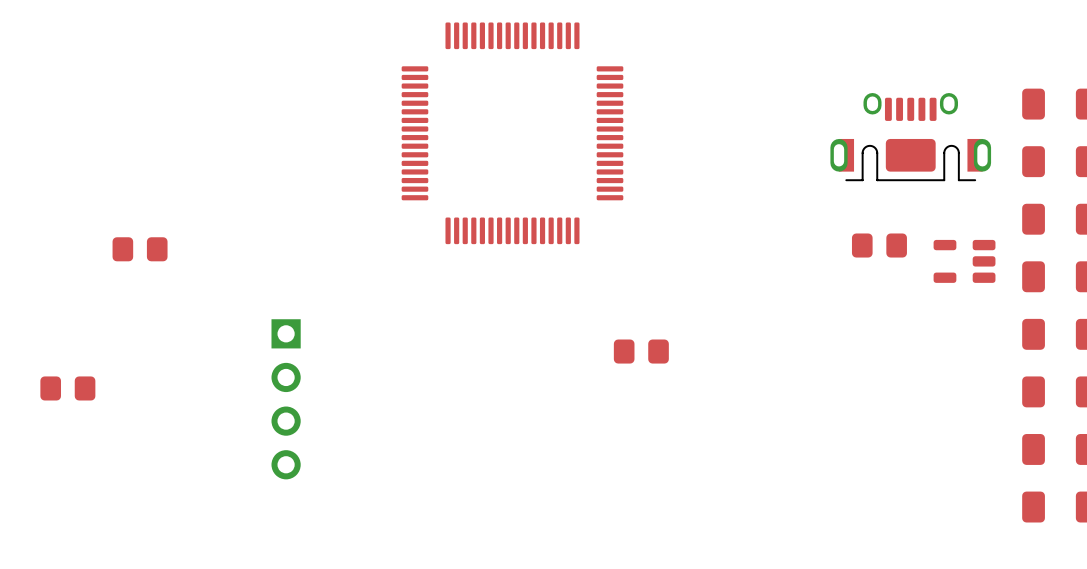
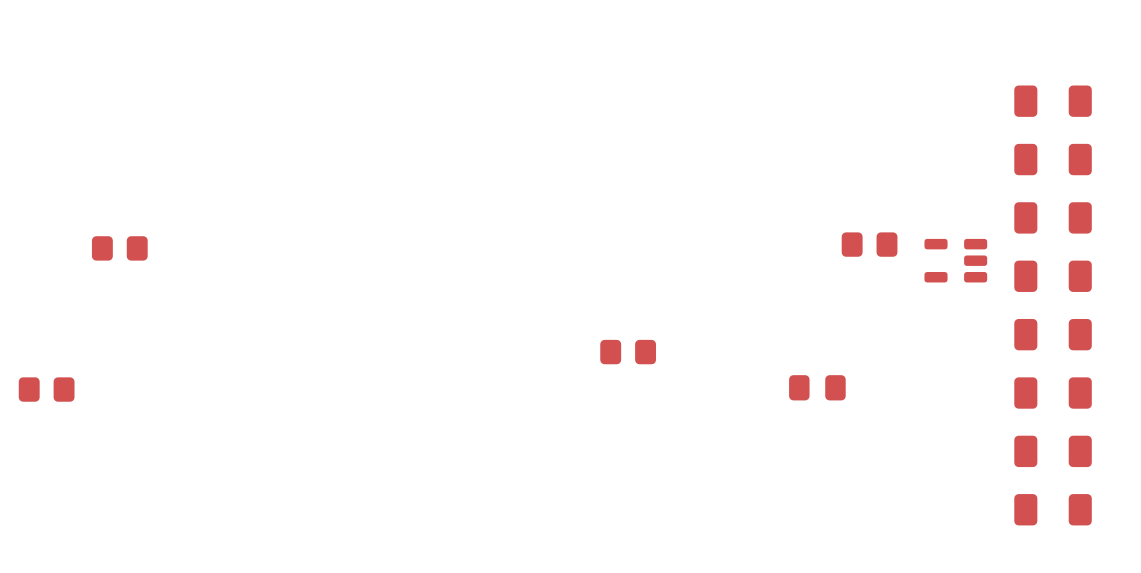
part: (512, 133) -> none
part: (910, 137) -> none
part: none -> (817, 387)
part: (286, 399) -> none

